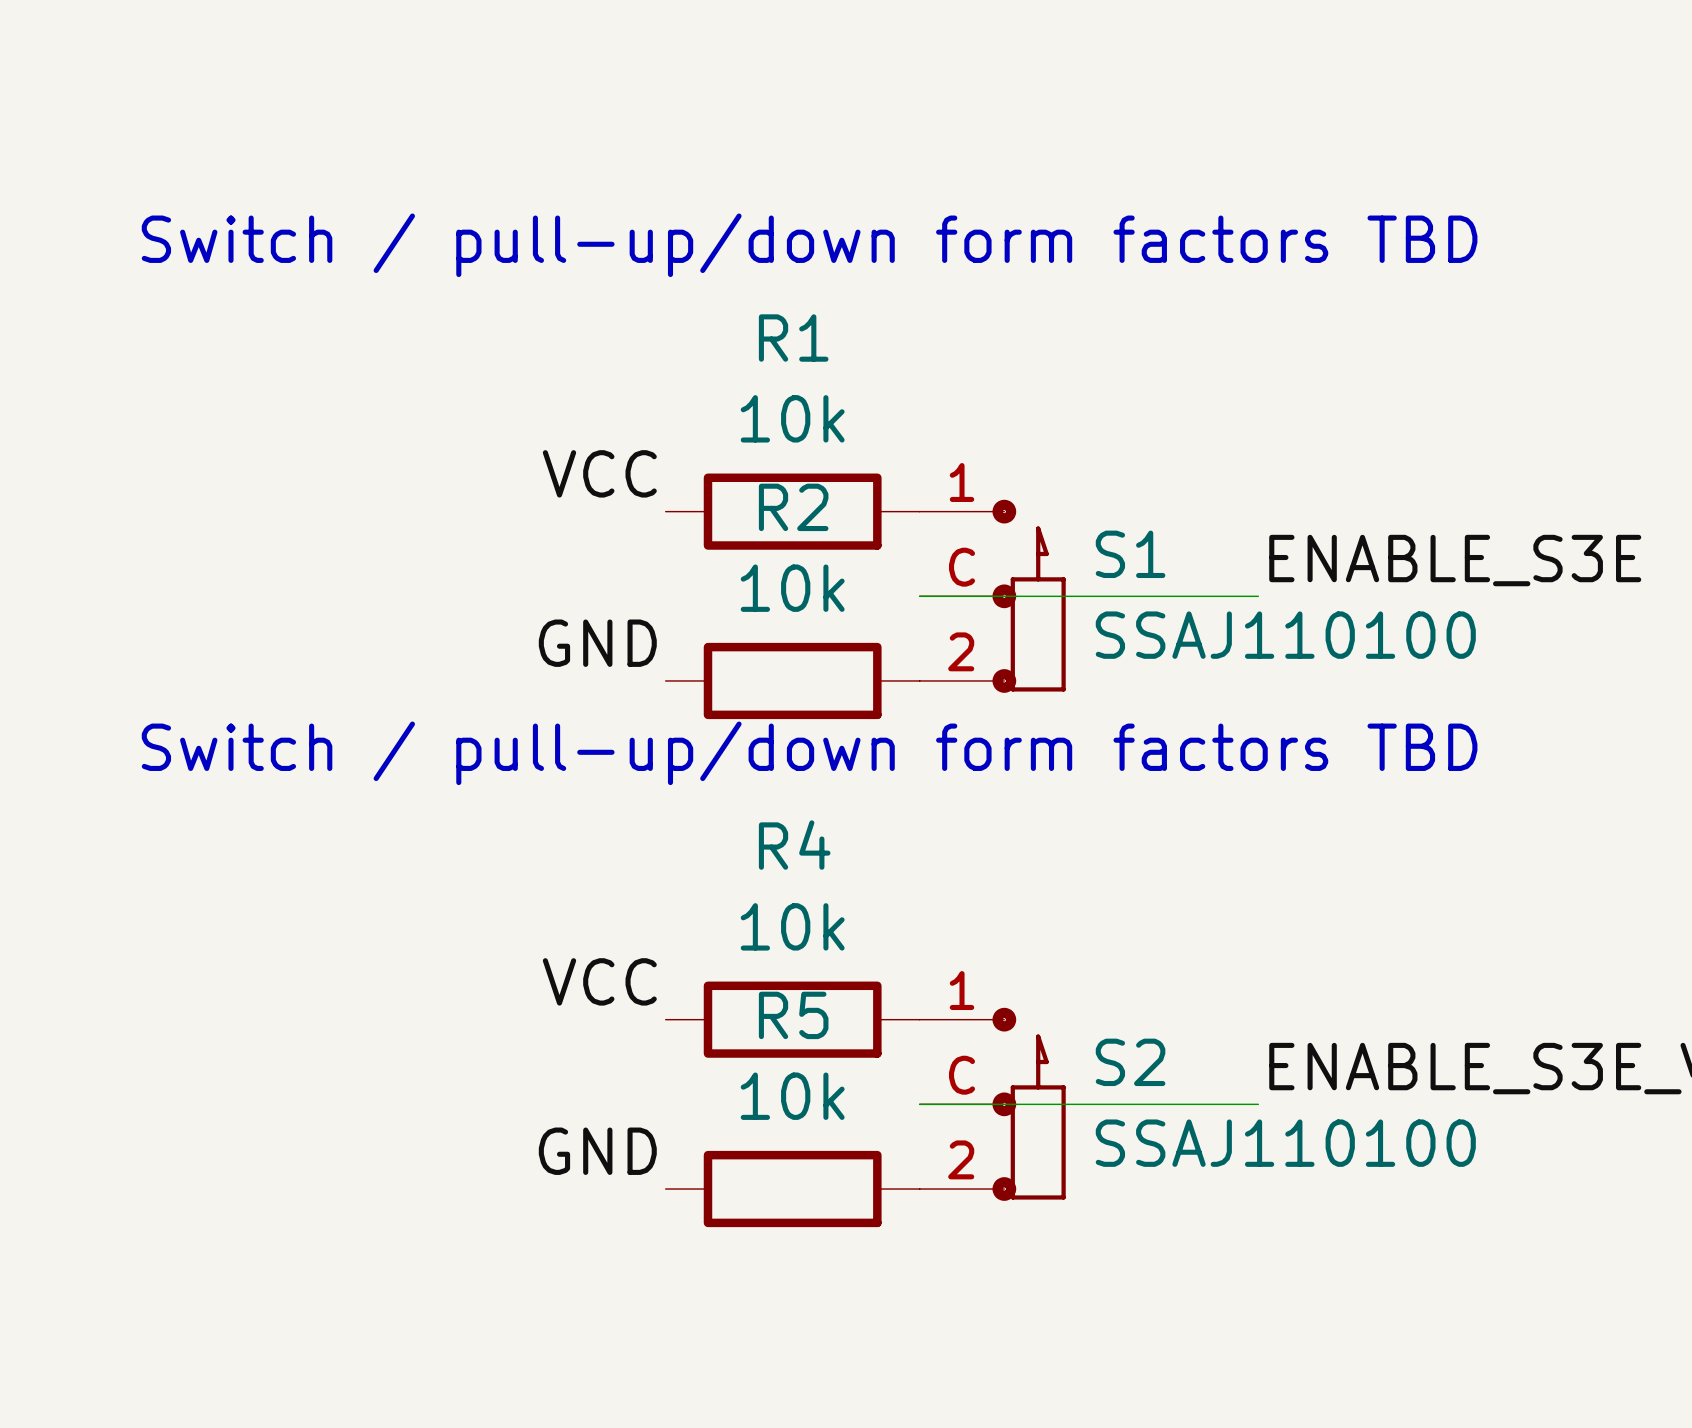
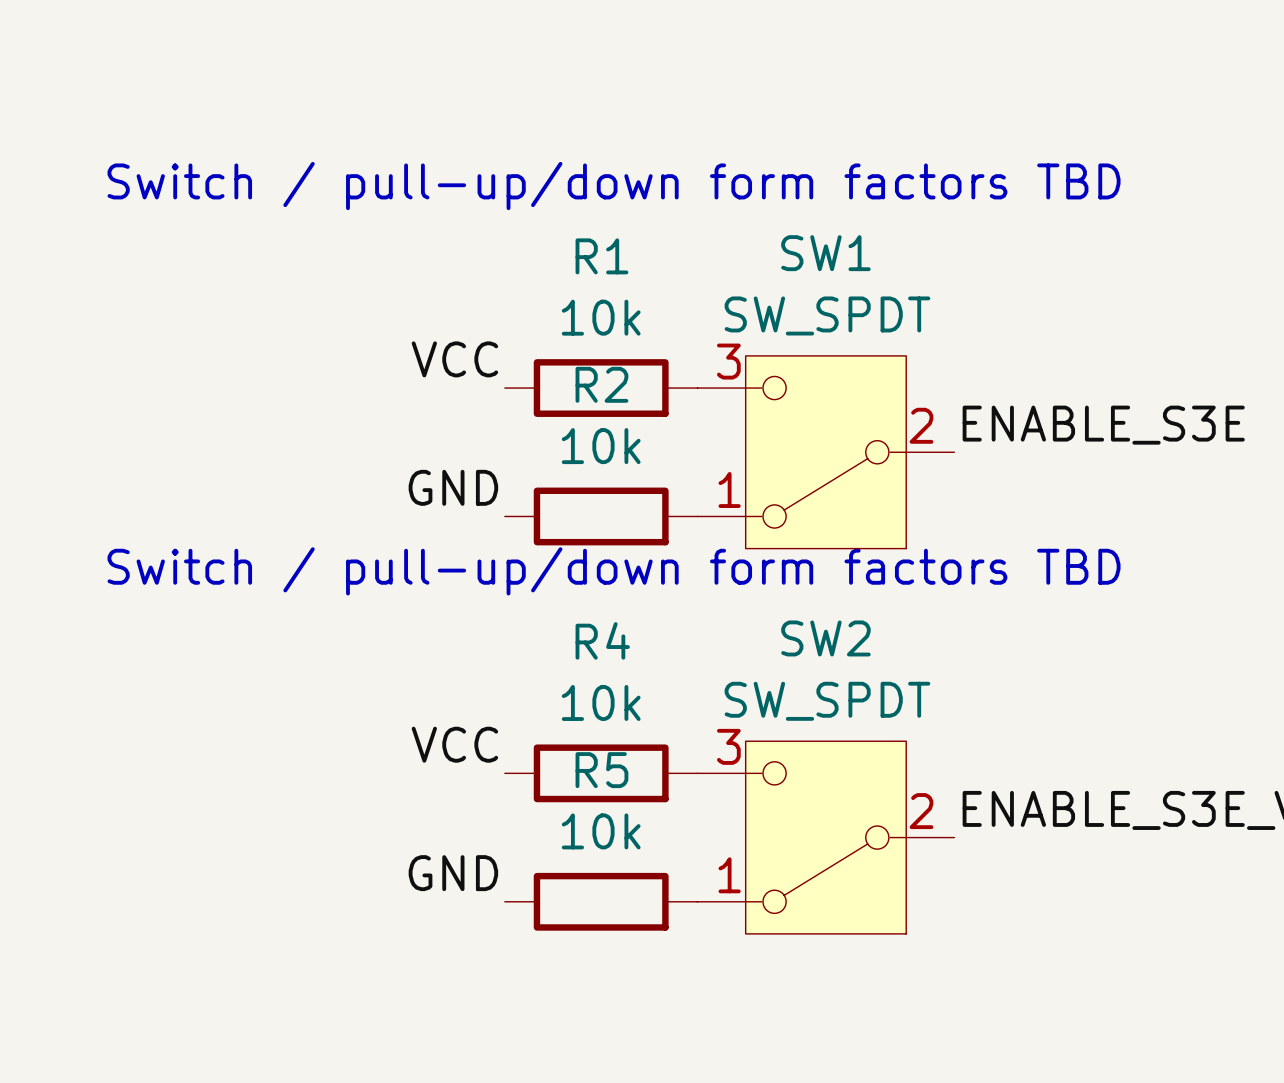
S1: SSAJ110100 (992, 596) -> none
SW1: none -> SW_SPDT (825, 452)
S2: SSAJ110100 (992, 1104) -> none
SW2: none -> SW_SPDT (825, 837)

